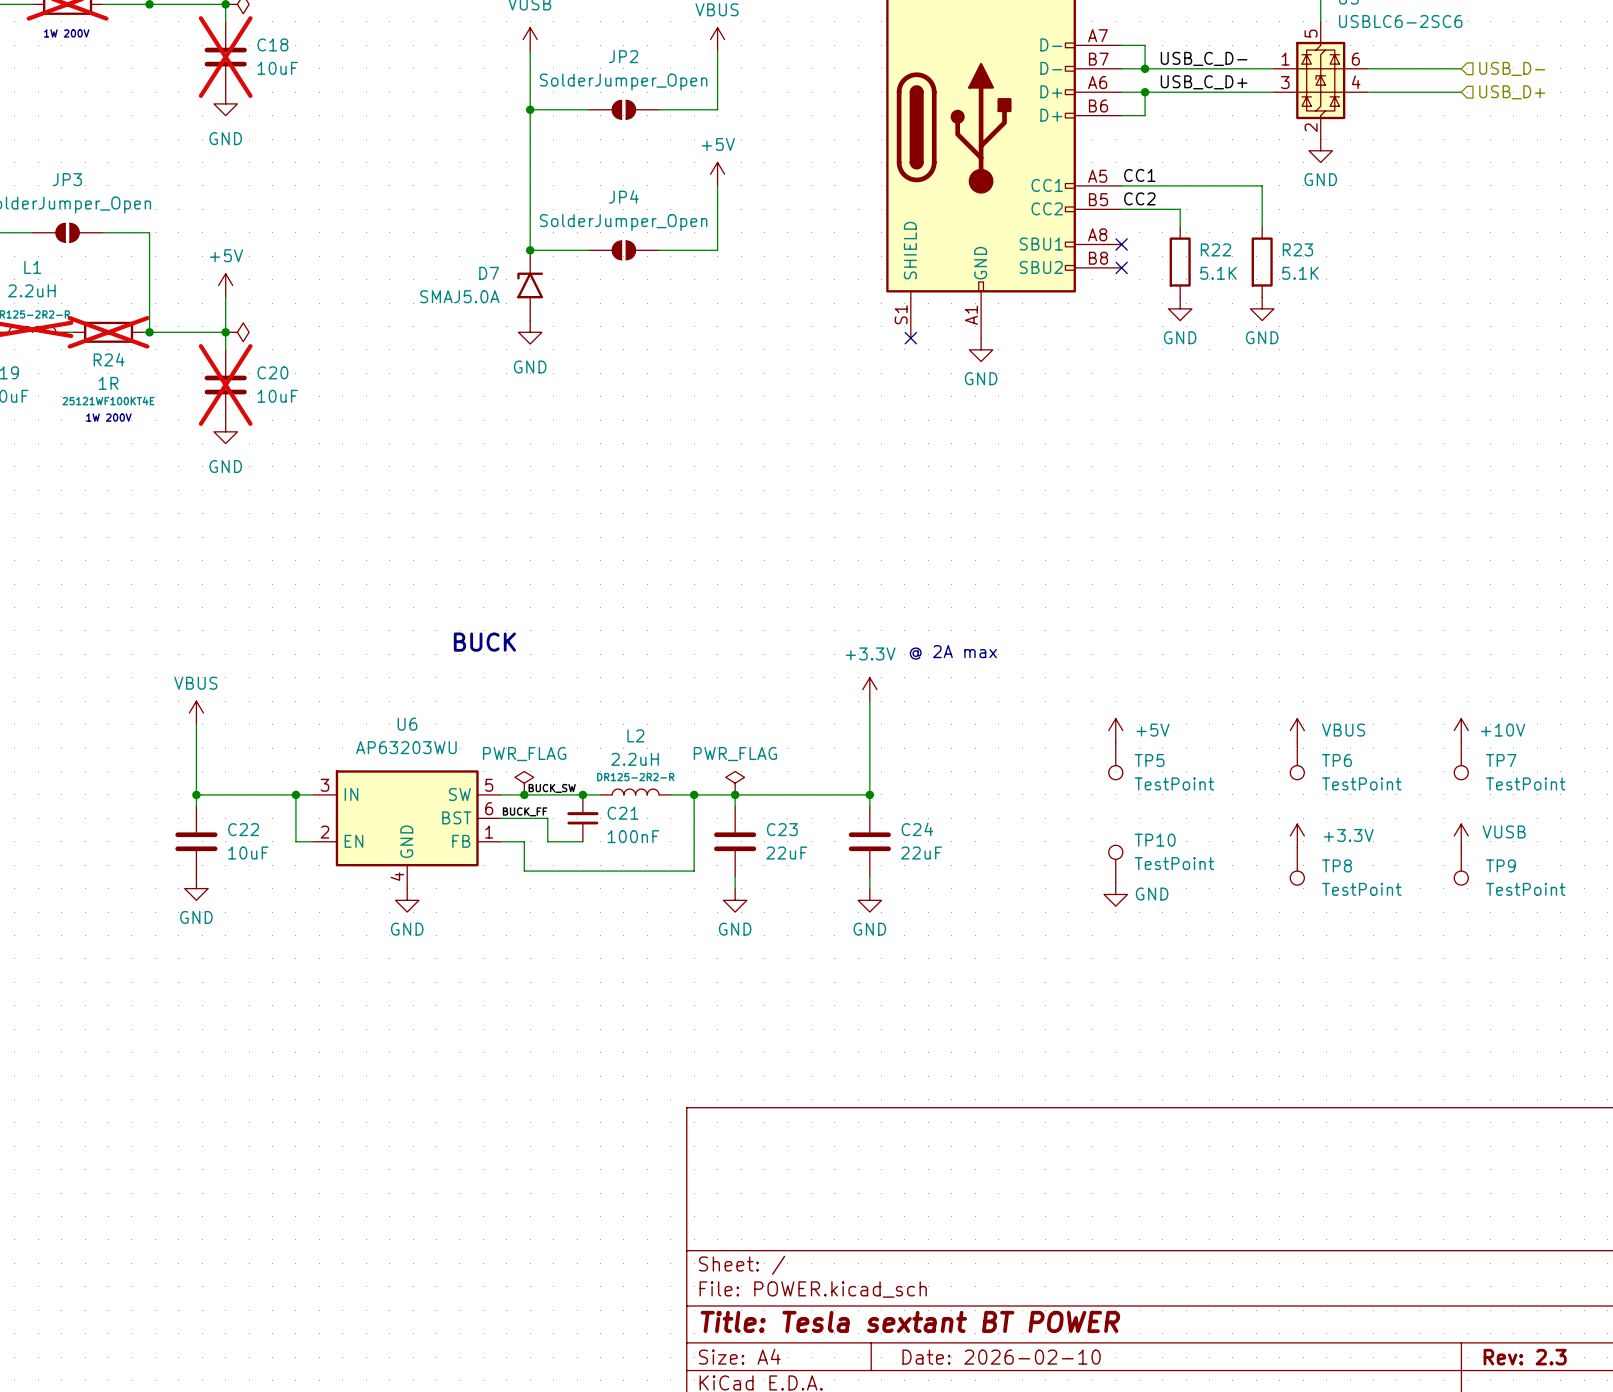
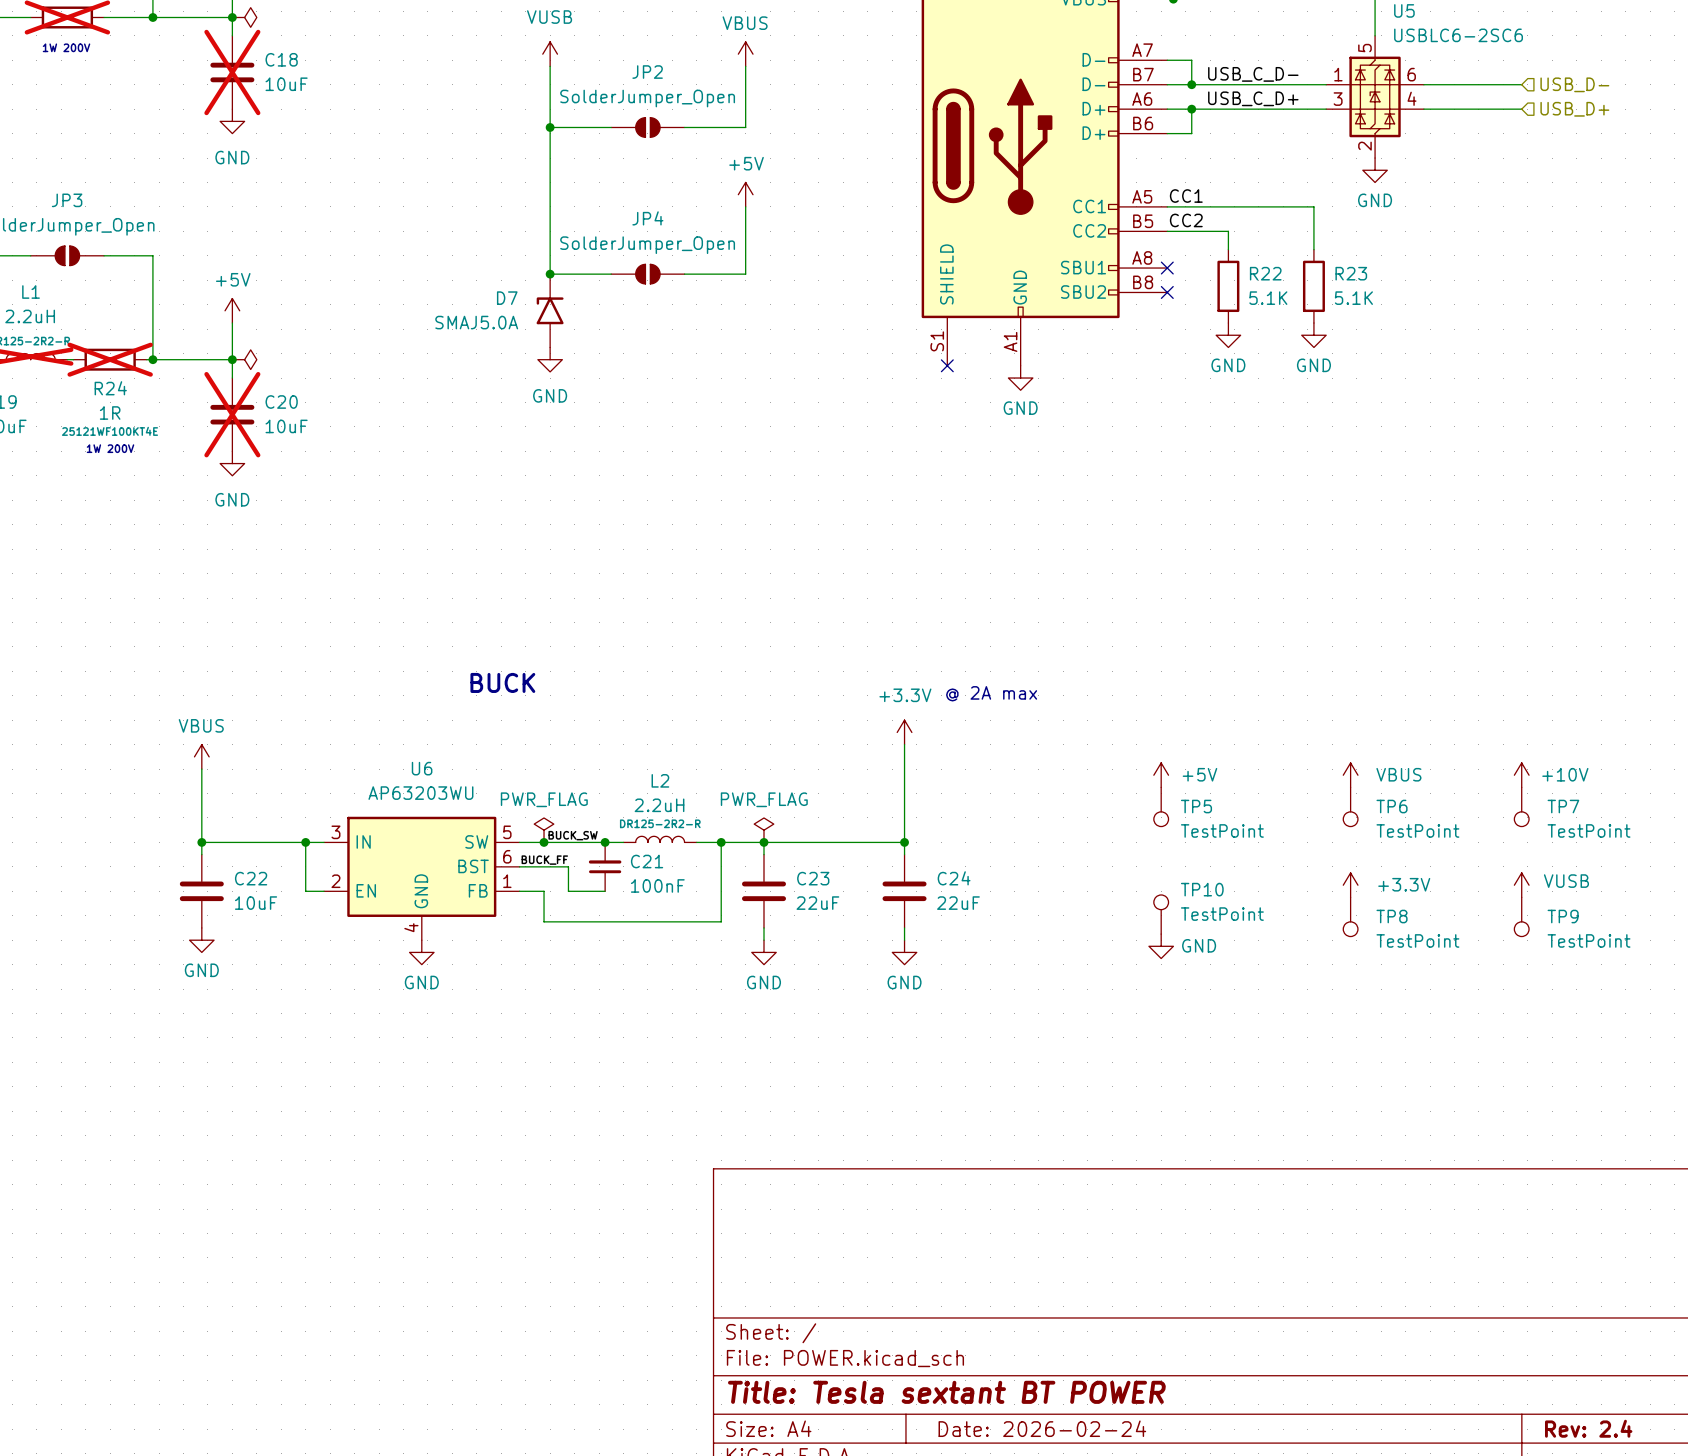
title block: Date: 2026-02-10 (1001, 1357) -> Date: 2026-02-24 (1042, 1428)
title block: Rev: 2.3 (1525, 1357) -> Rev: 2.4 (1588, 1428)

